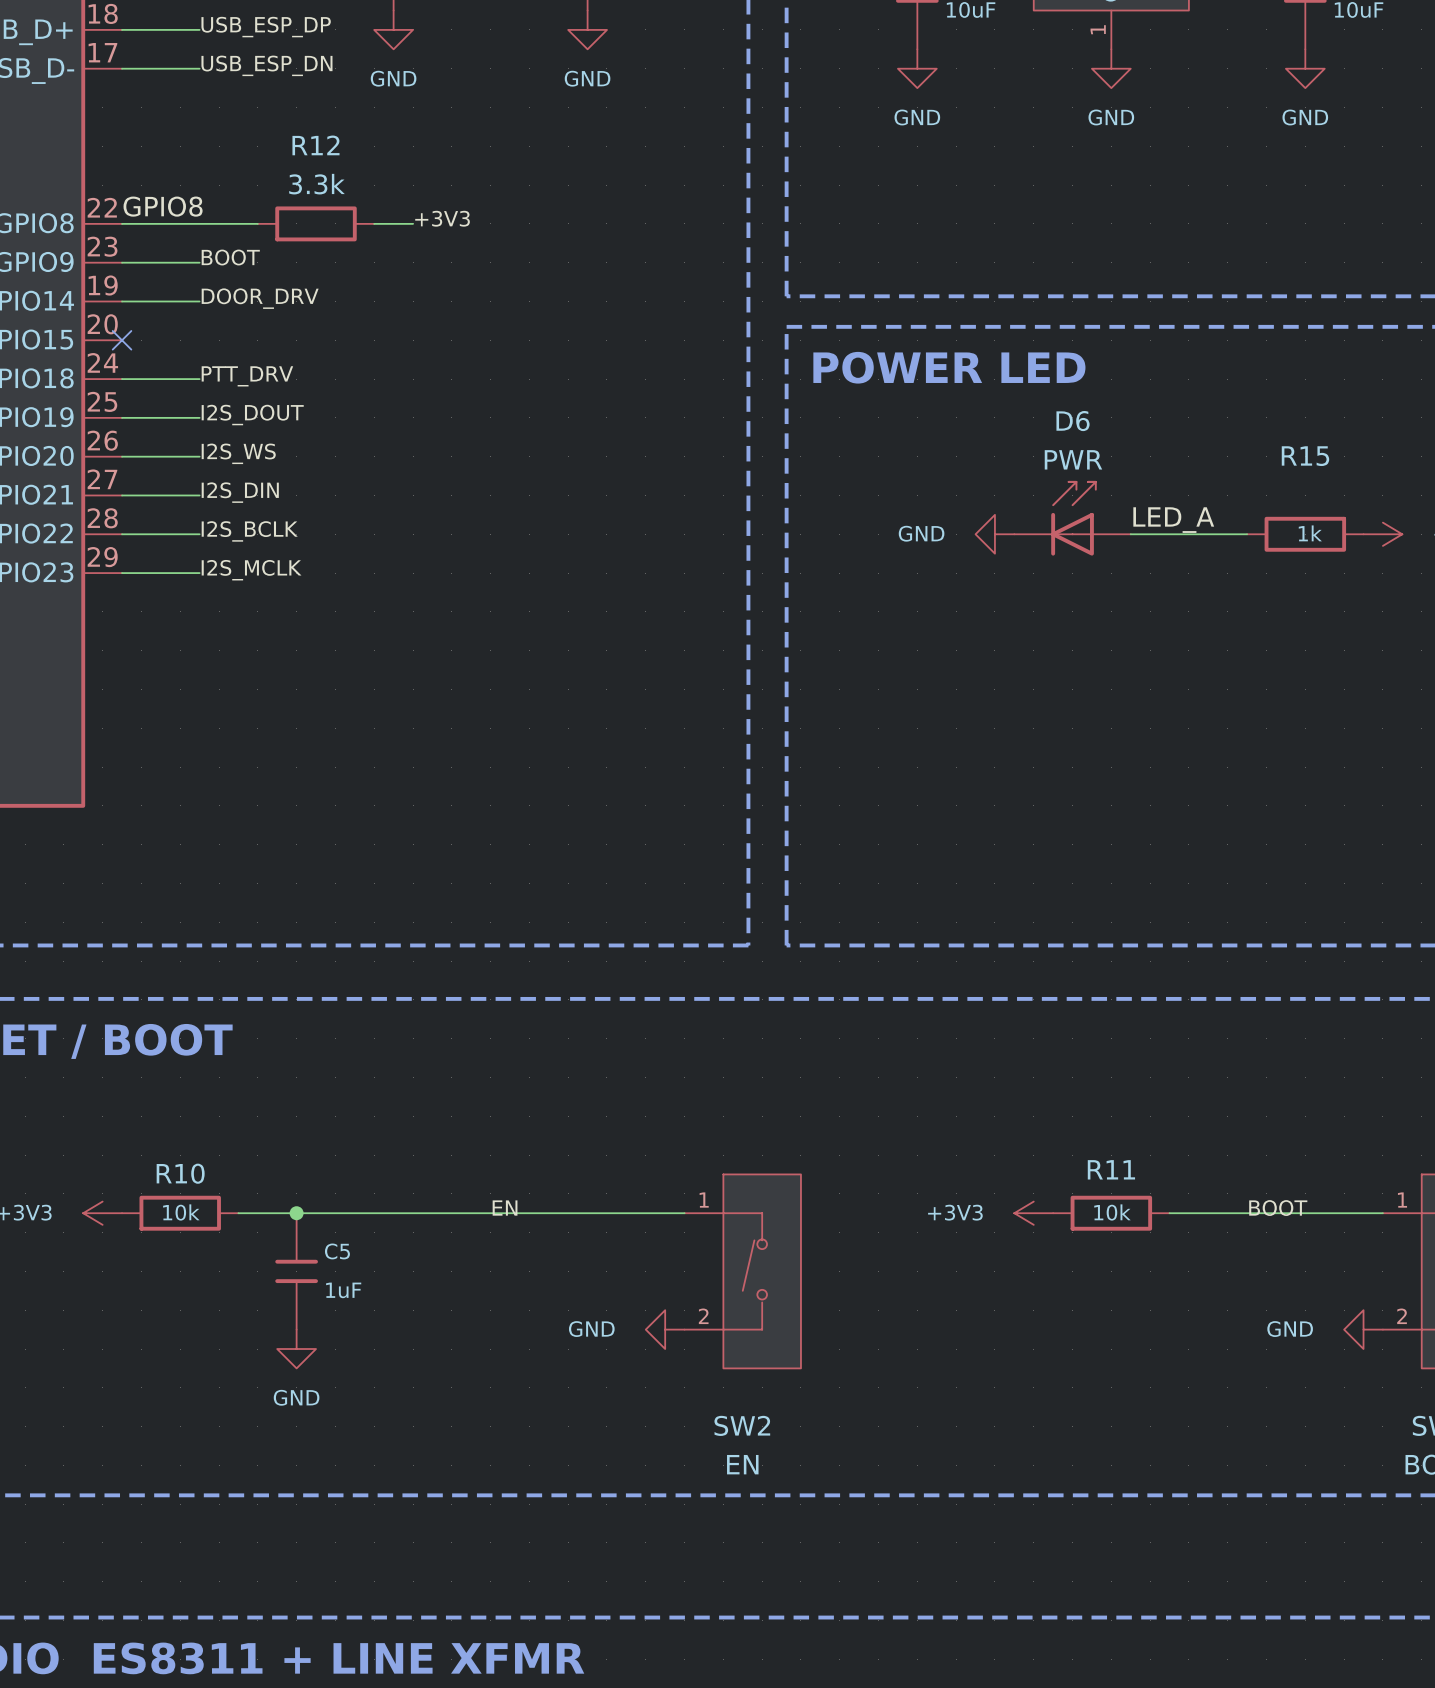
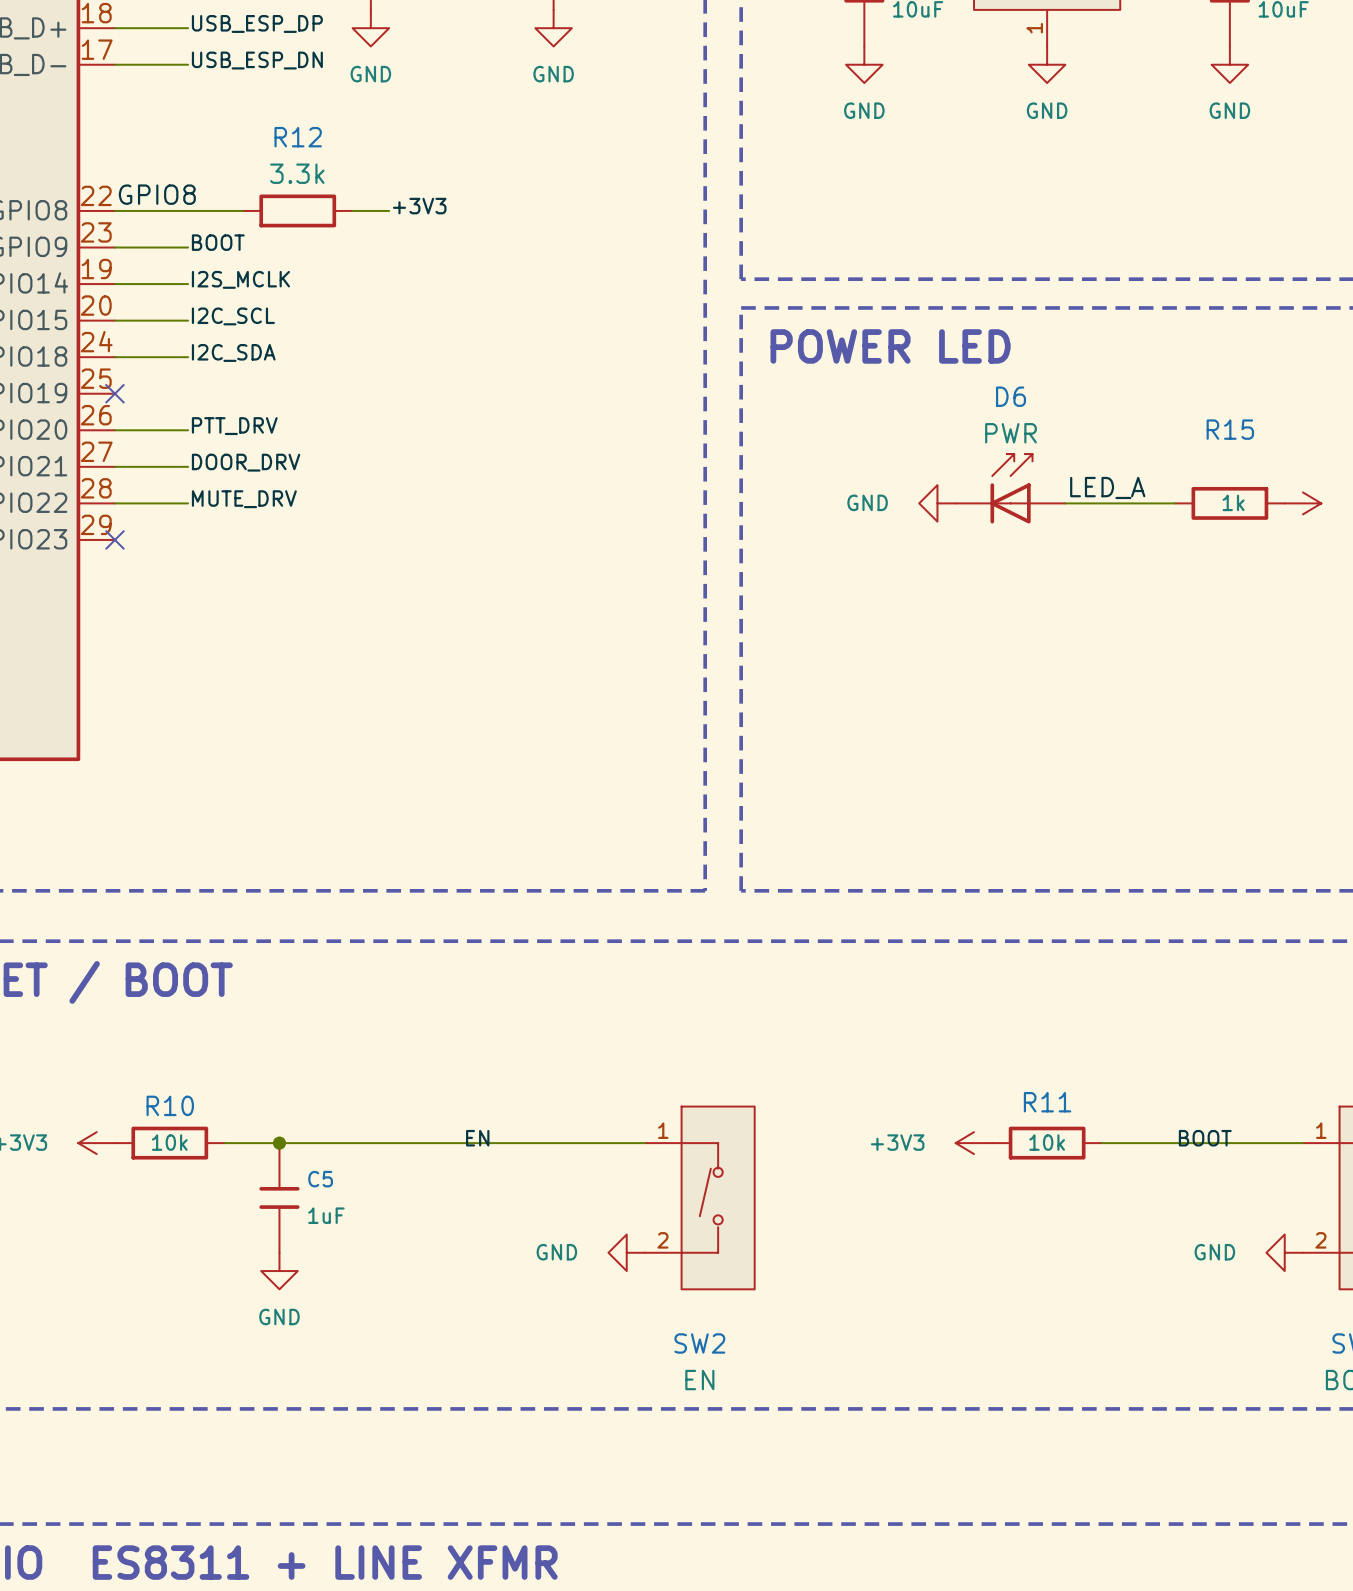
label: DOOR_DRV (260, 298) -> I2S_MCLK (240, 279)
label: none -> I2C_SCL (233, 316)
no-connect mark position: (122, 340) -> (114, 393)
label: PTT_DRV (247, 376) -> I2C_SDA (233, 352)
label: I2S_DOUT (252, 415) -> none
wire: (122, 417) (199, 417) -> (114, 320) (188, 320)
label: I2S_WS (238, 453) -> PTT_DRV (234, 426)
label: I2S_DIN (240, 492) -> DOOR_DRV (246, 462)
label: I2S_BCLK (249, 531) -> MUTE_DRV (244, 499)
label: I2S_MCLK (251, 570) -> none
wire: (122, 573) (199, 573) -> none
no-connect mark: none -> (114, 539)

